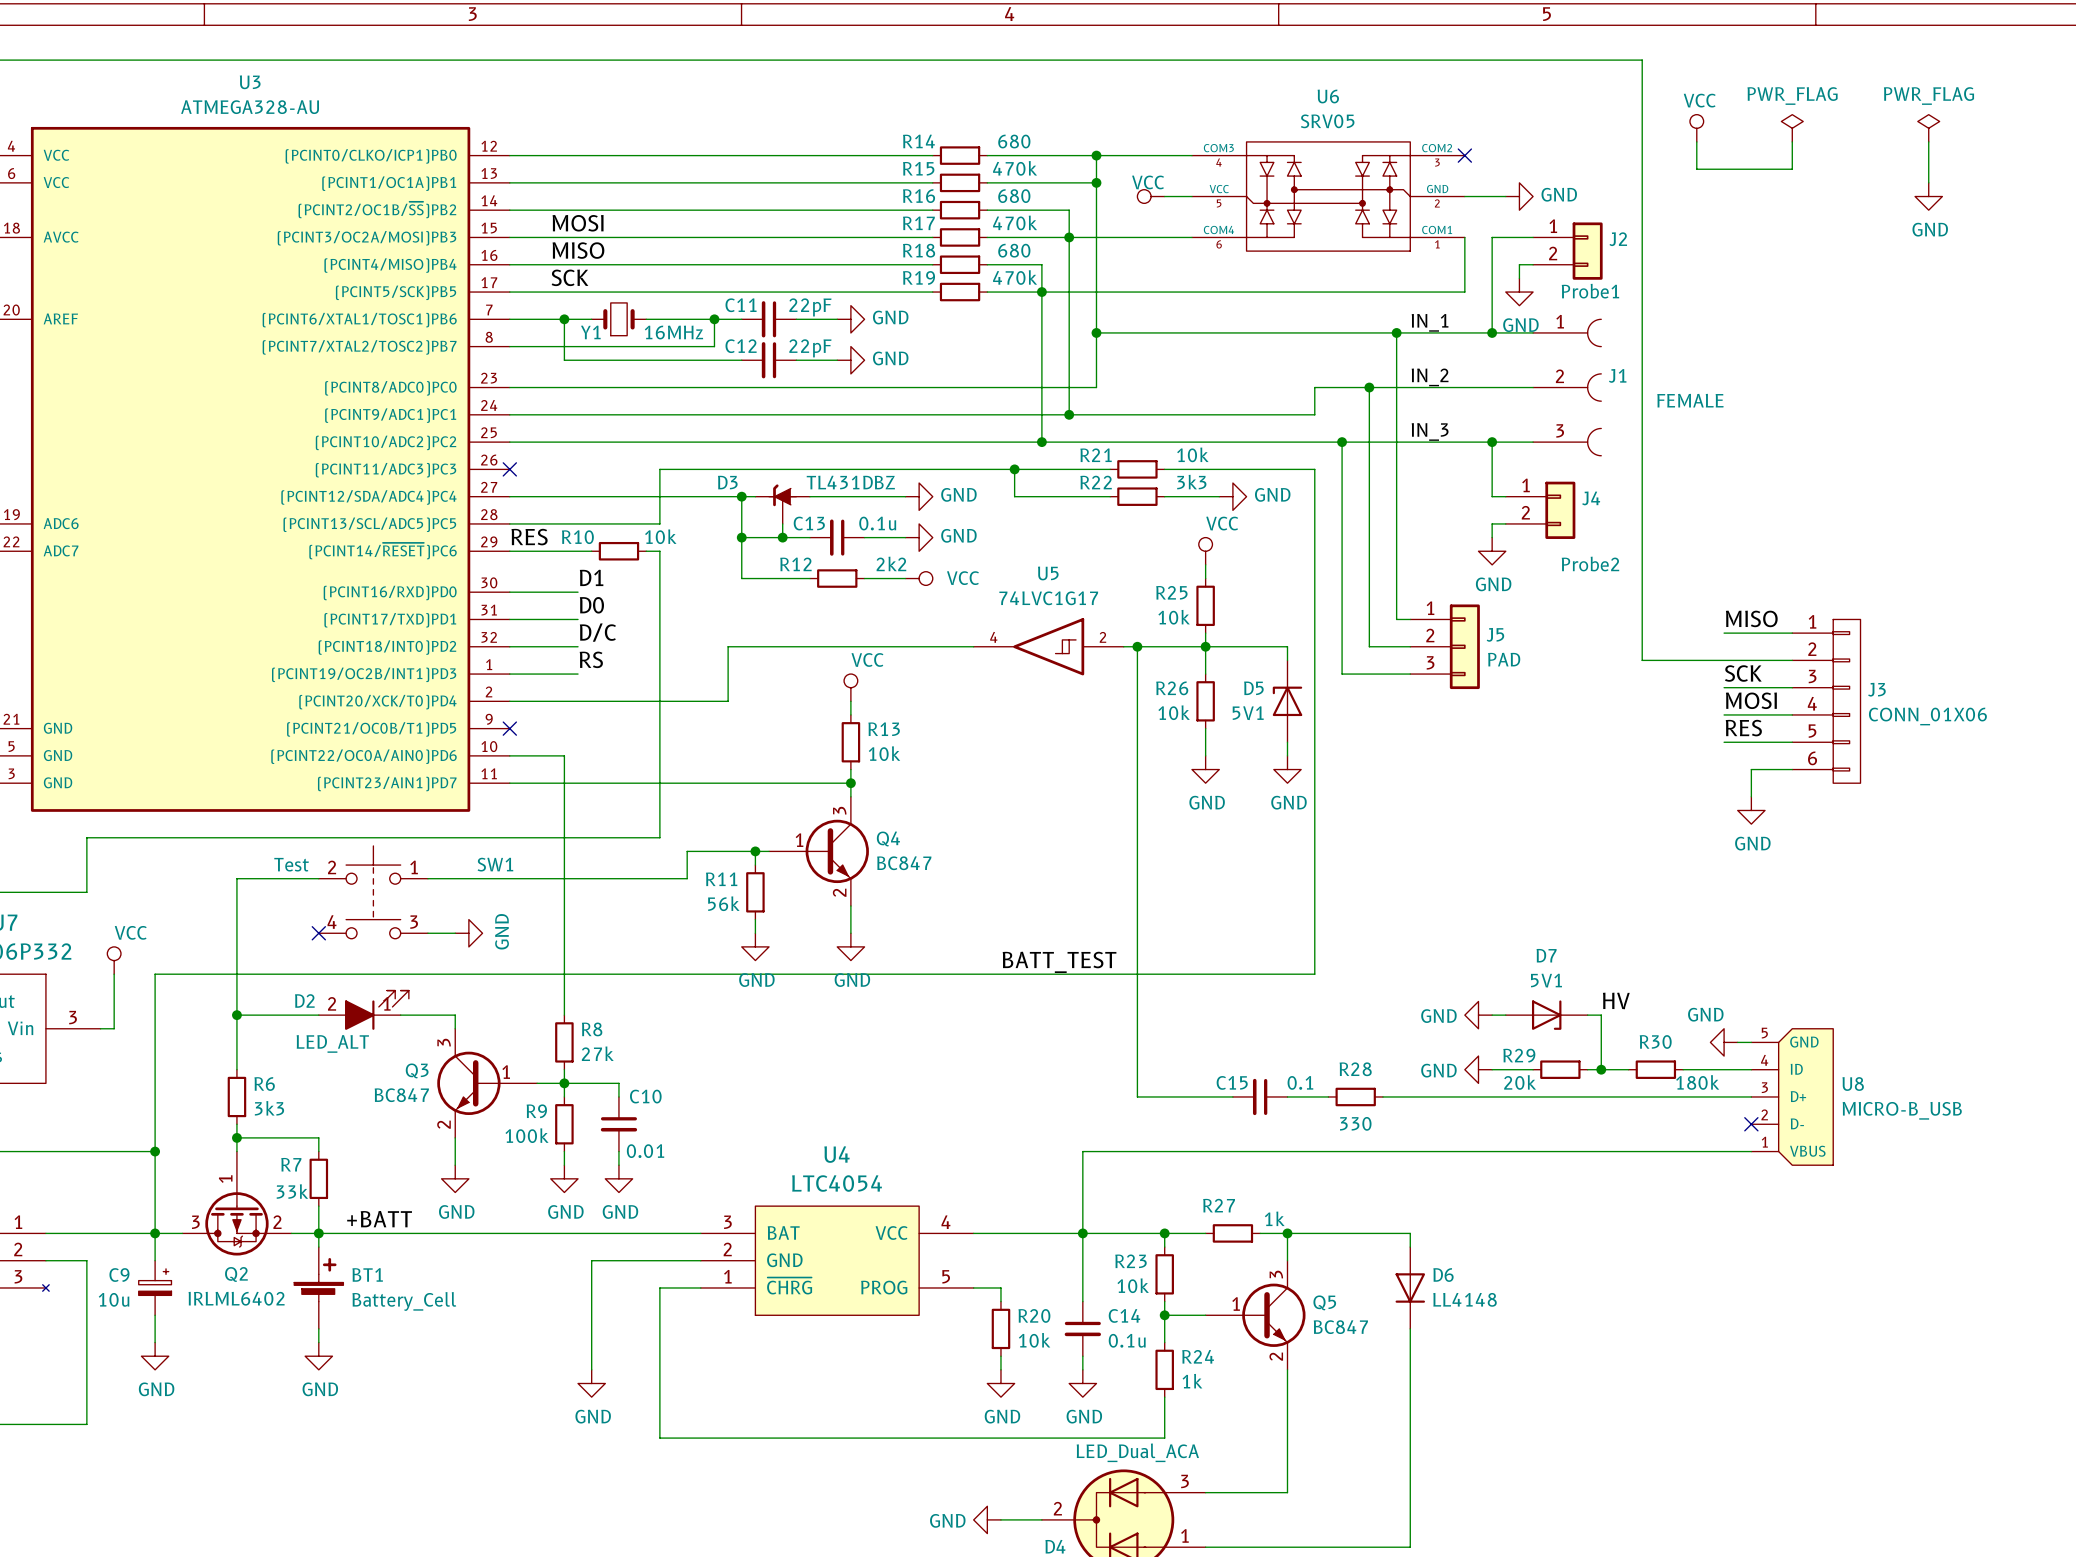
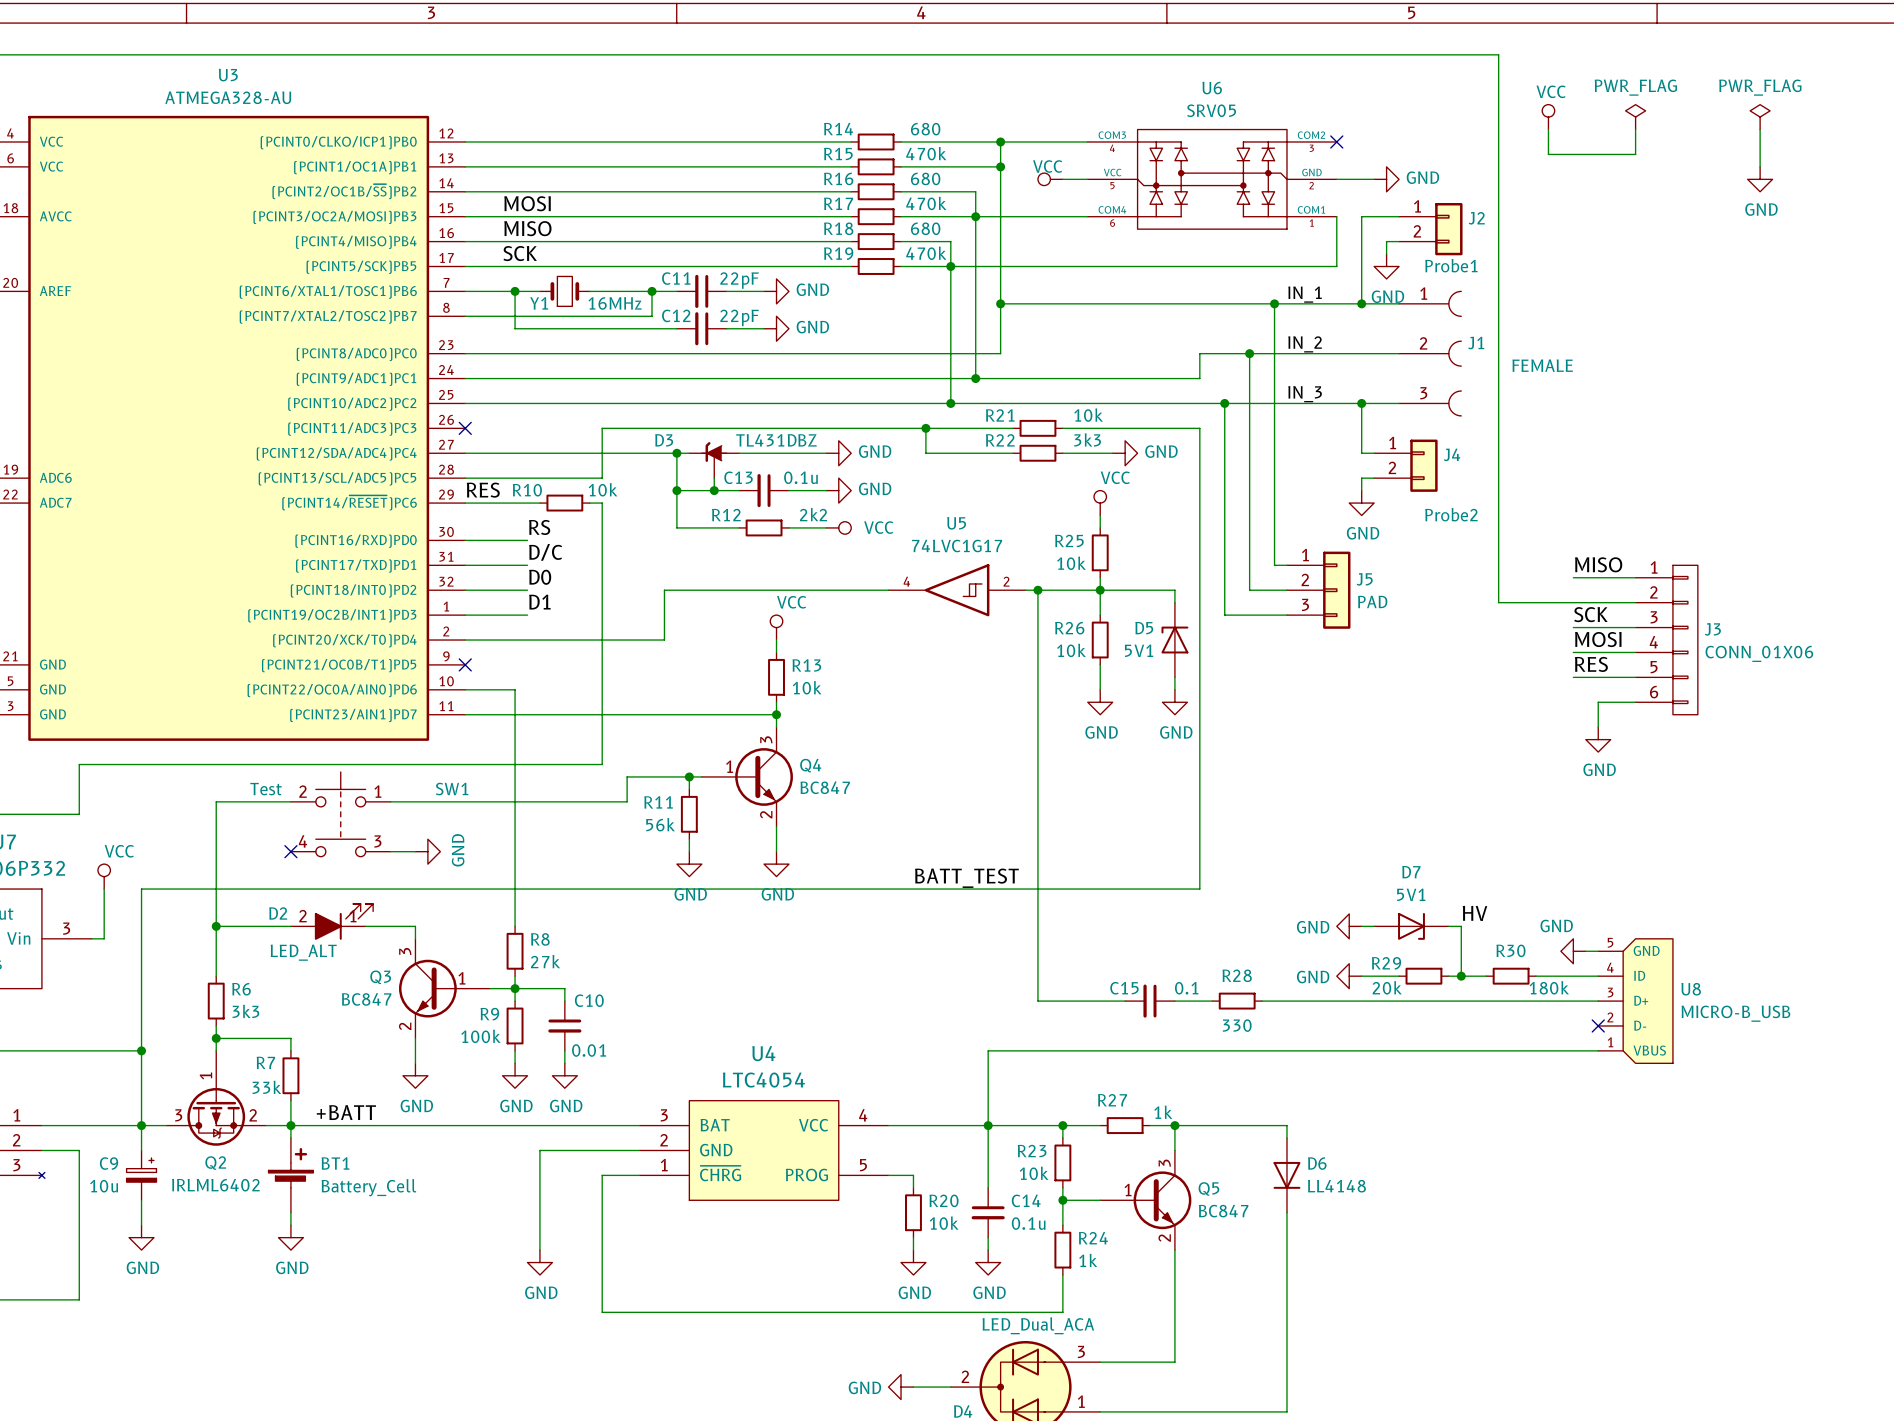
label: D1 (591, 577) -> RS (539, 527)
label: D0 (591, 605) -> D/C (545, 552)
label: D/C (597, 632) -> D0 (540, 577)
label: RS (591, 659) -> D1 (539, 602)

